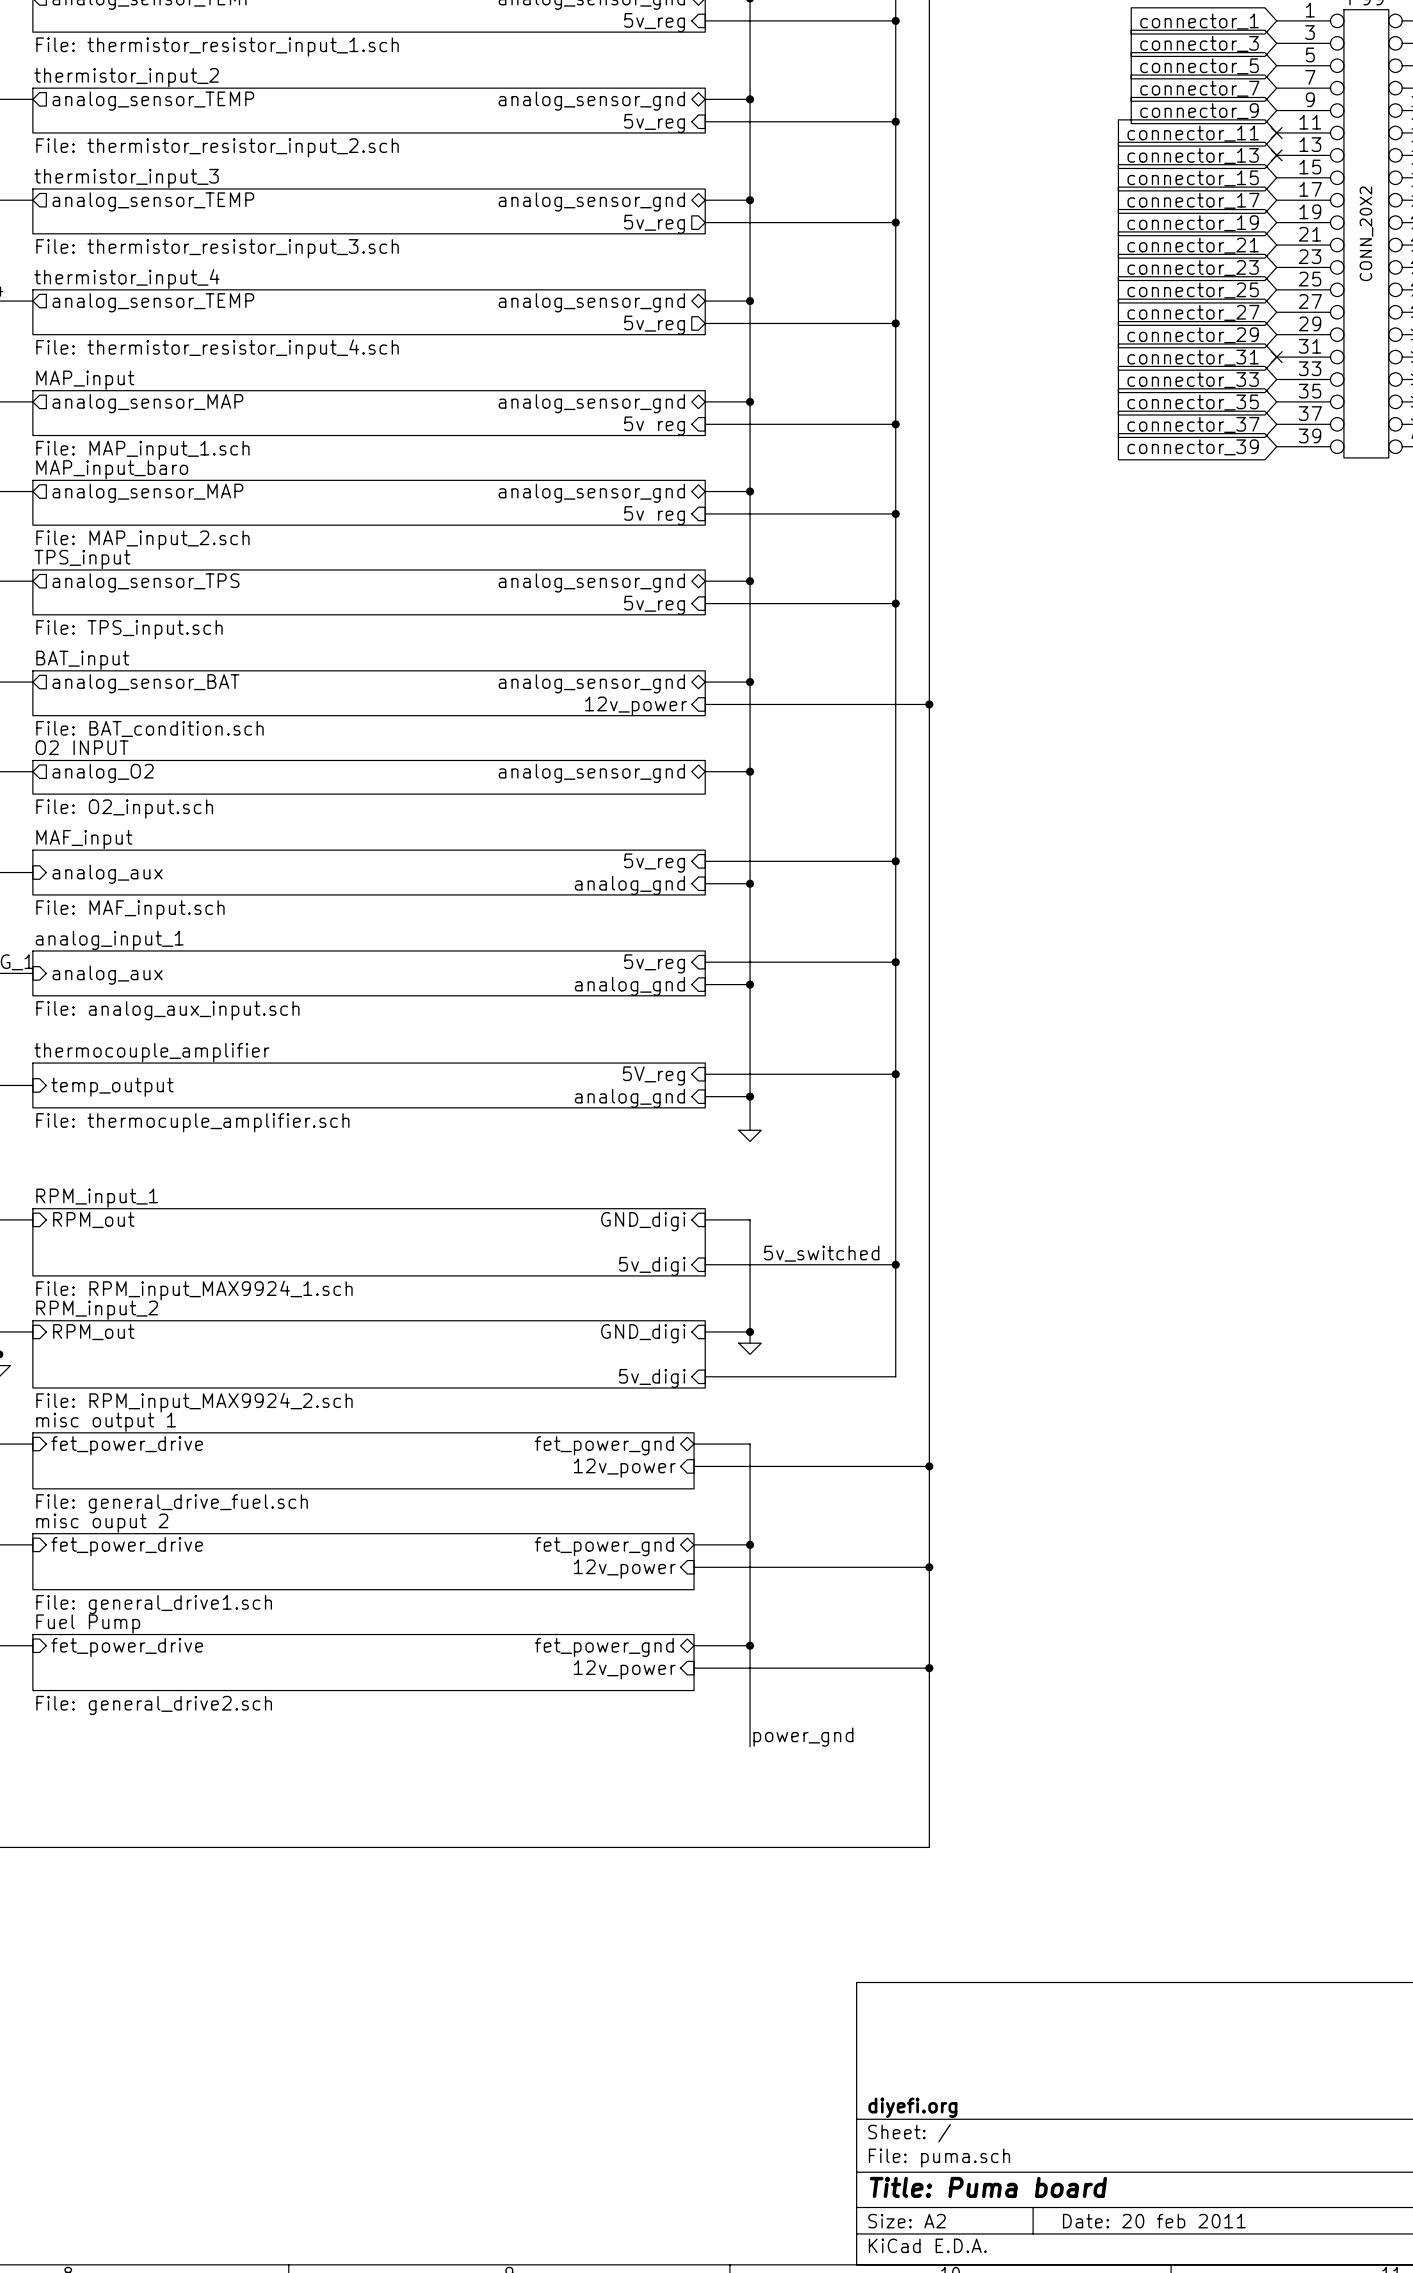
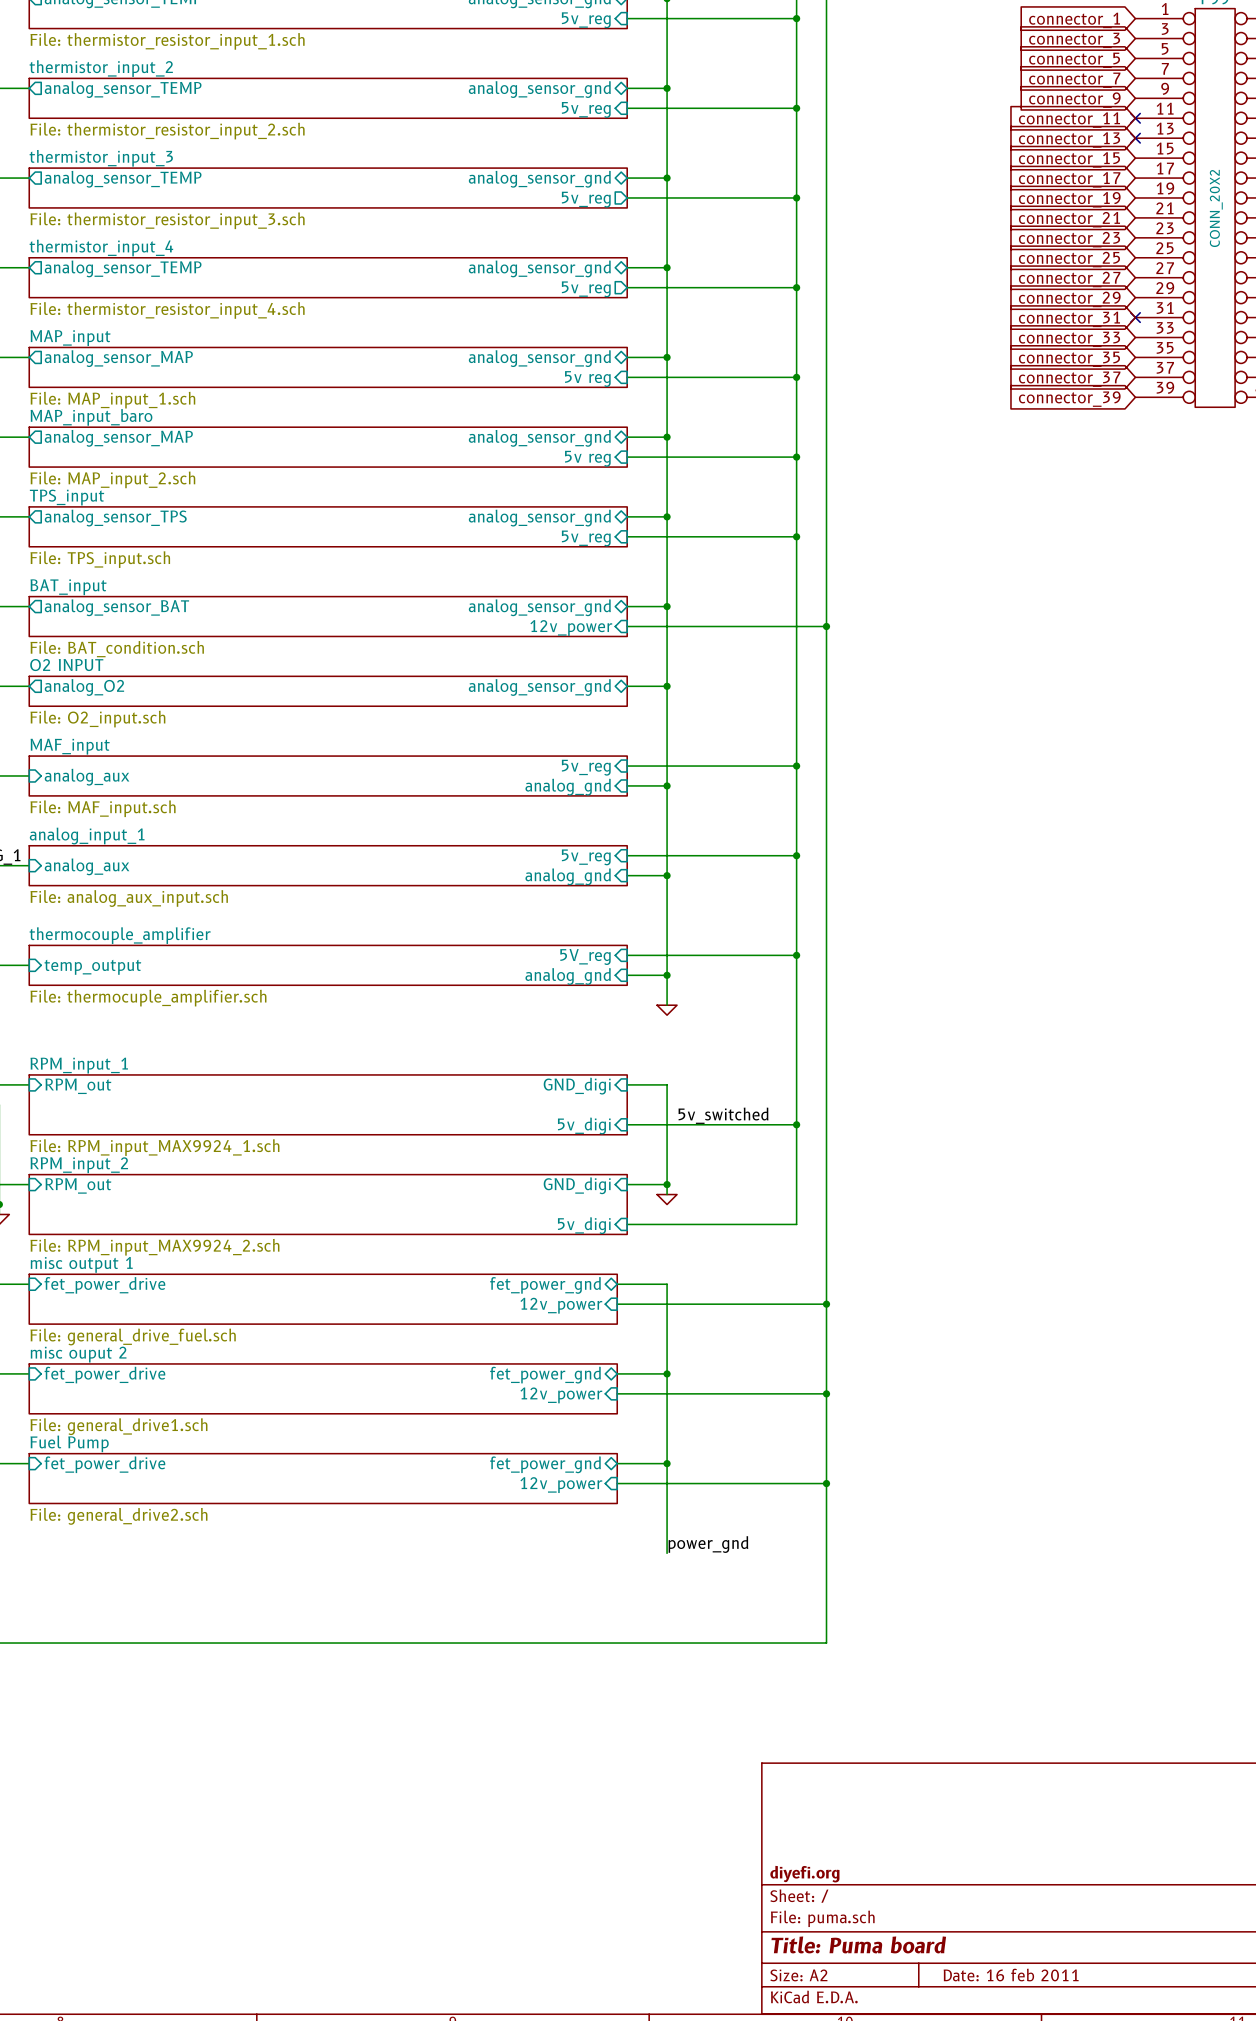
title block: Date: 20 feb 2011 (1154, 2221) -> Date: 16 feb 2011 (1011, 1975)

